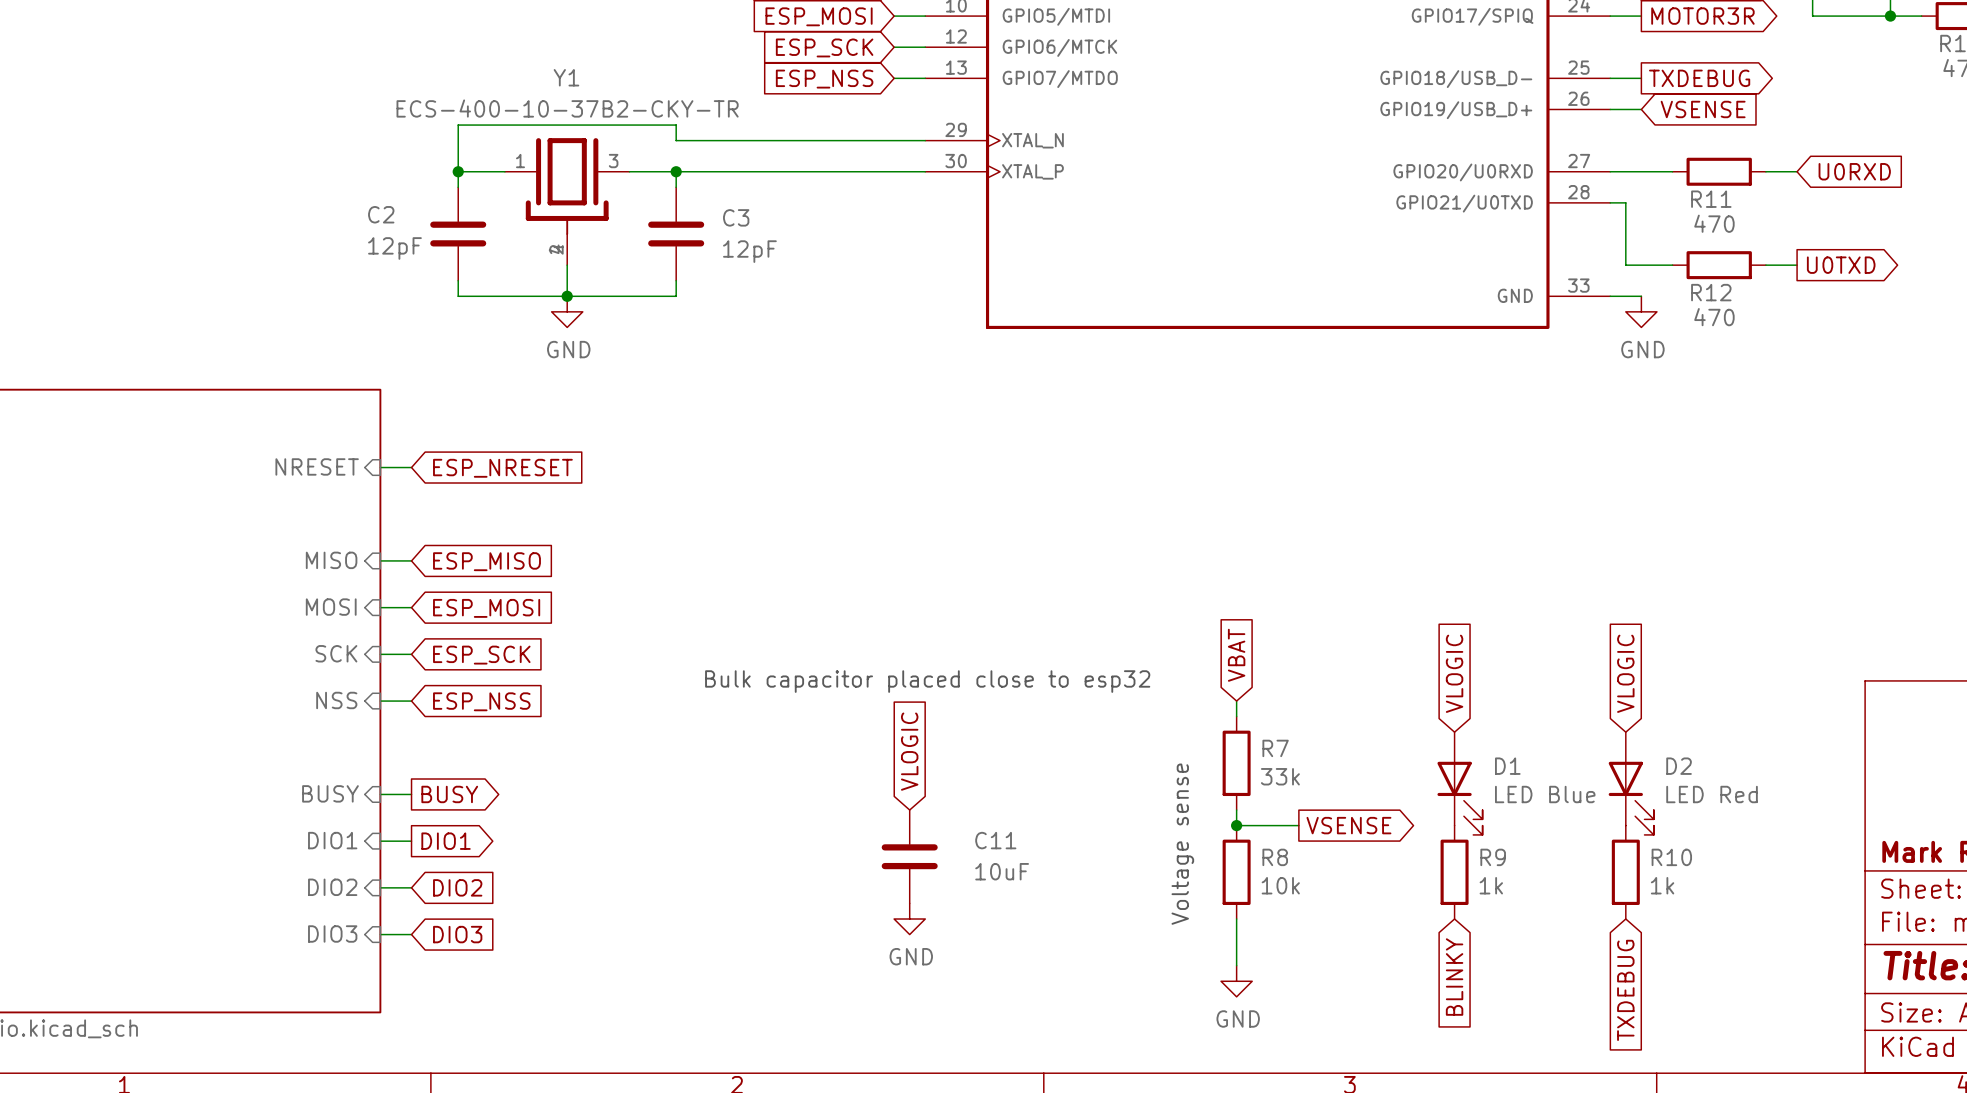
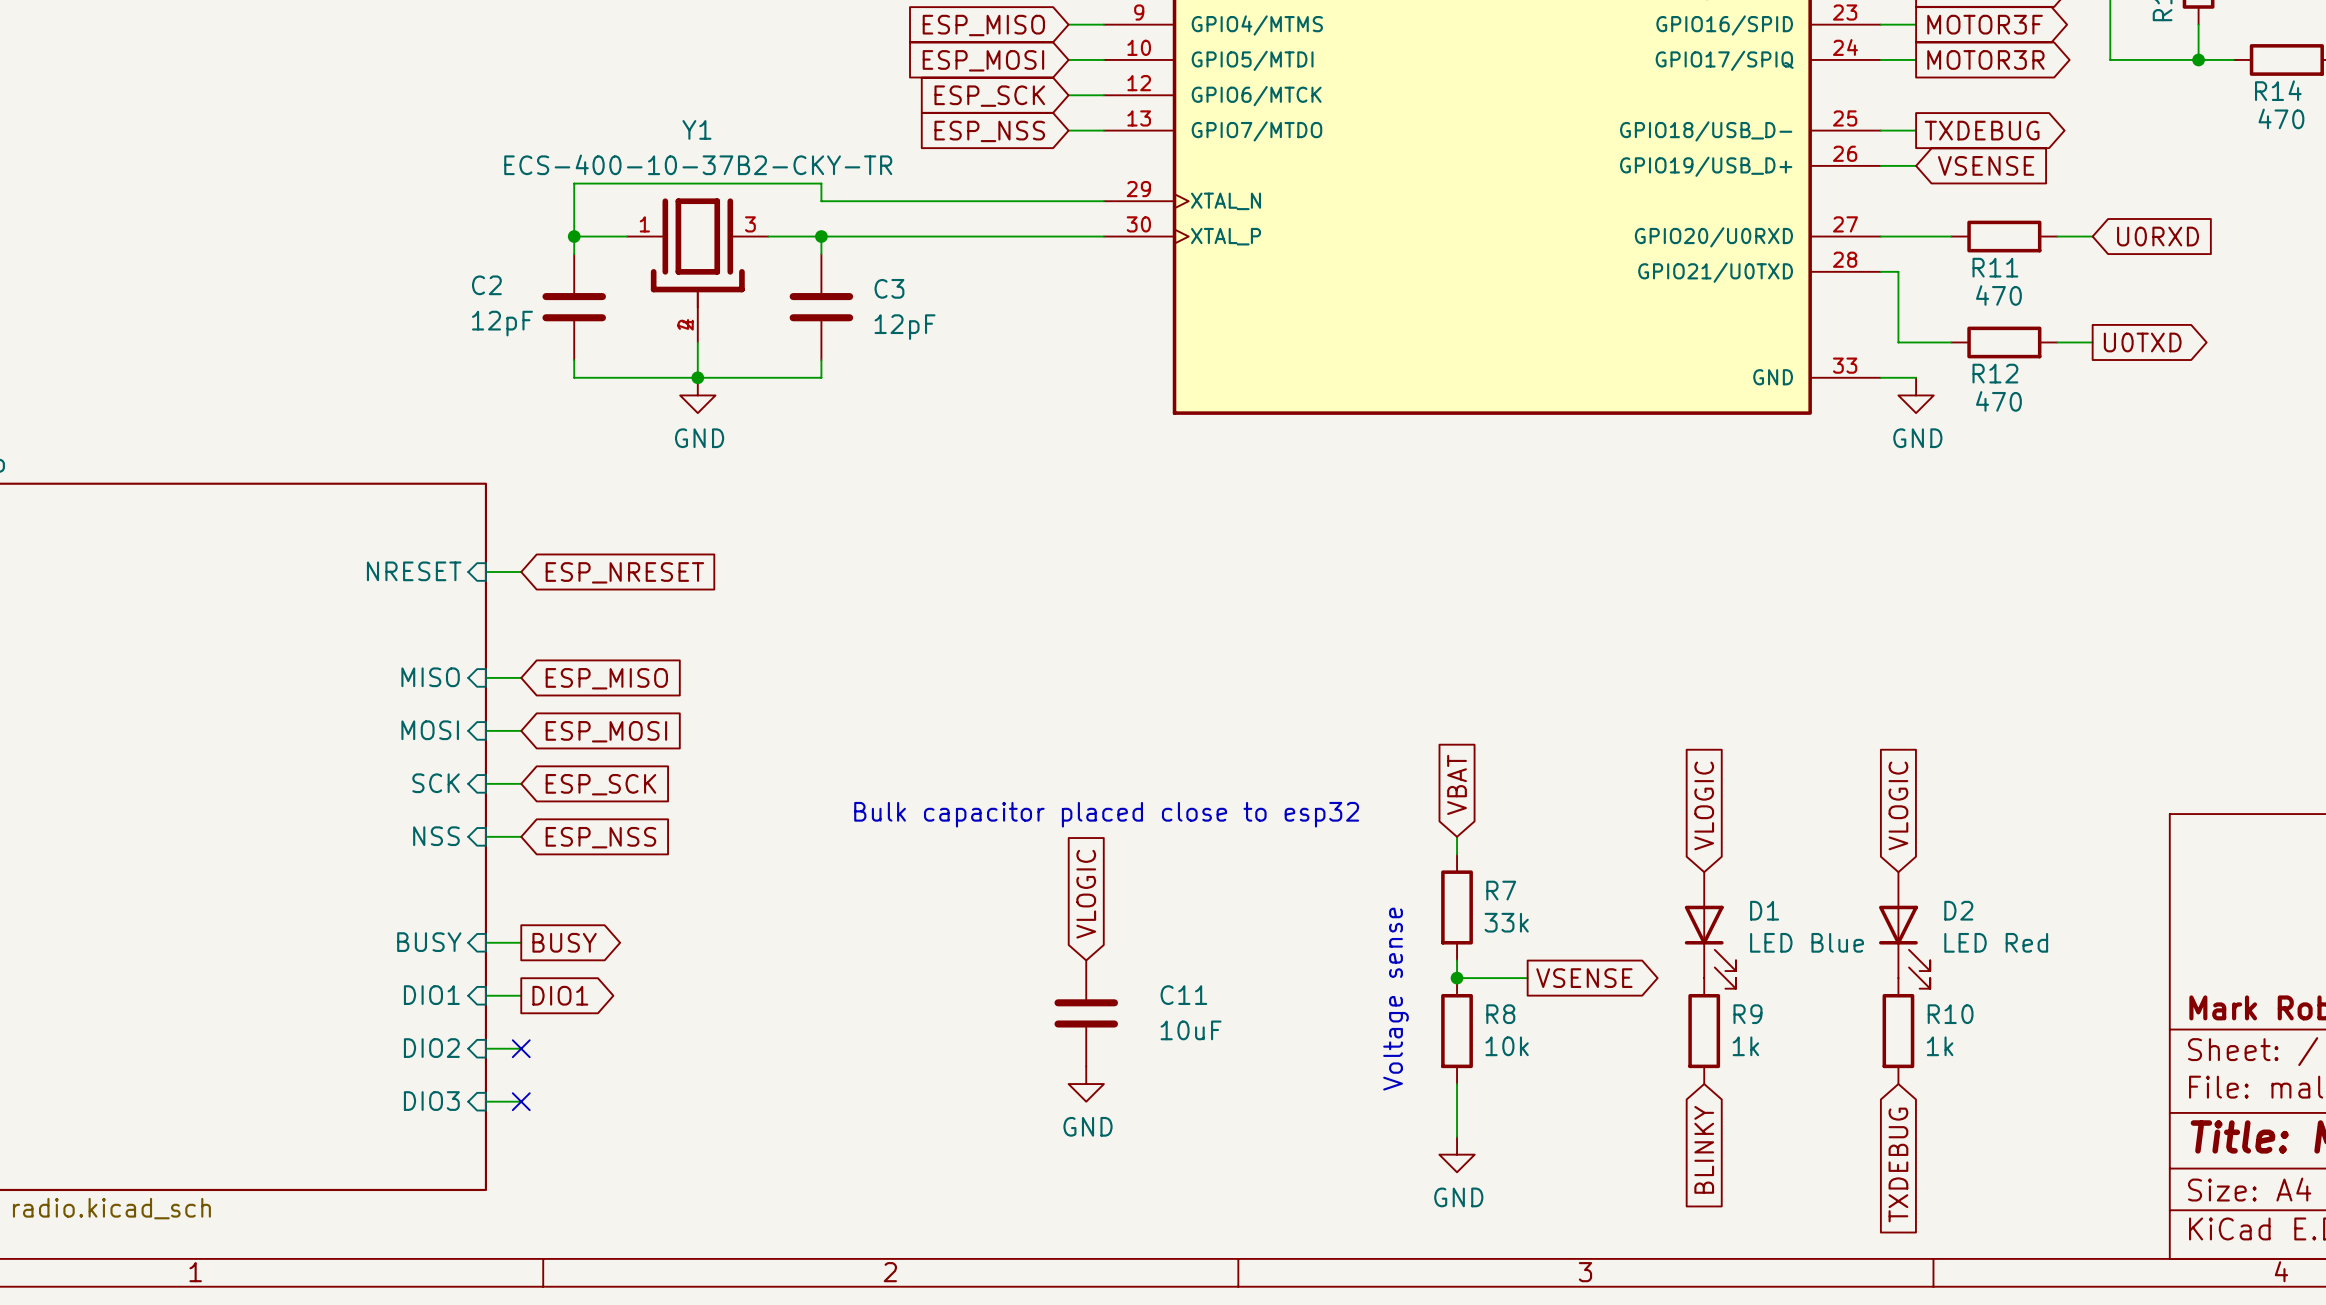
no-connect mark: none -> (521, 1048)
global label: DIO2 (457, 887) -> none
no-connect mark: none -> (521, 1101)
global label: DIO3 (457, 934) -> none

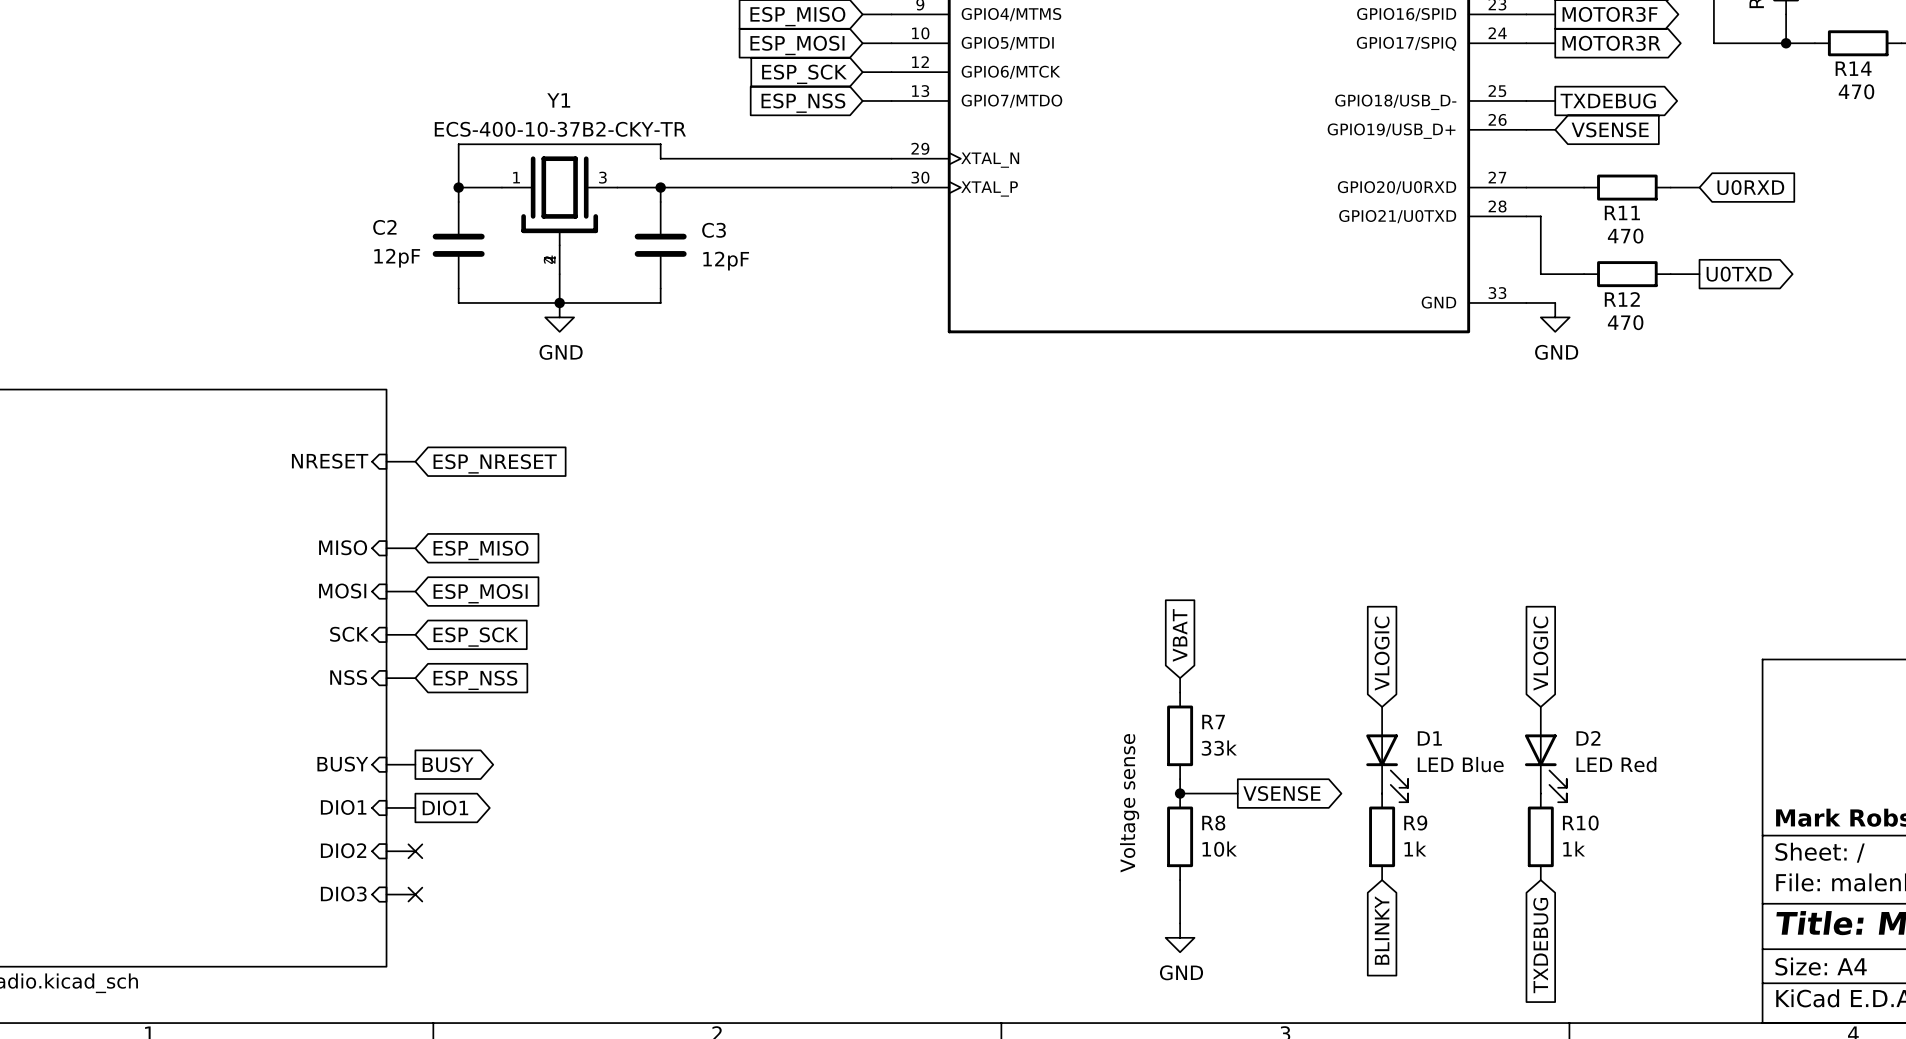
text: Bulk capacitor placed close to esp32 (1106, 814) -> none
global label: VLOGIC (1086, 894) -> none
C11: 10uF (1086, 1013) -> none
power symbol: GND (1086, 1084) -> none

